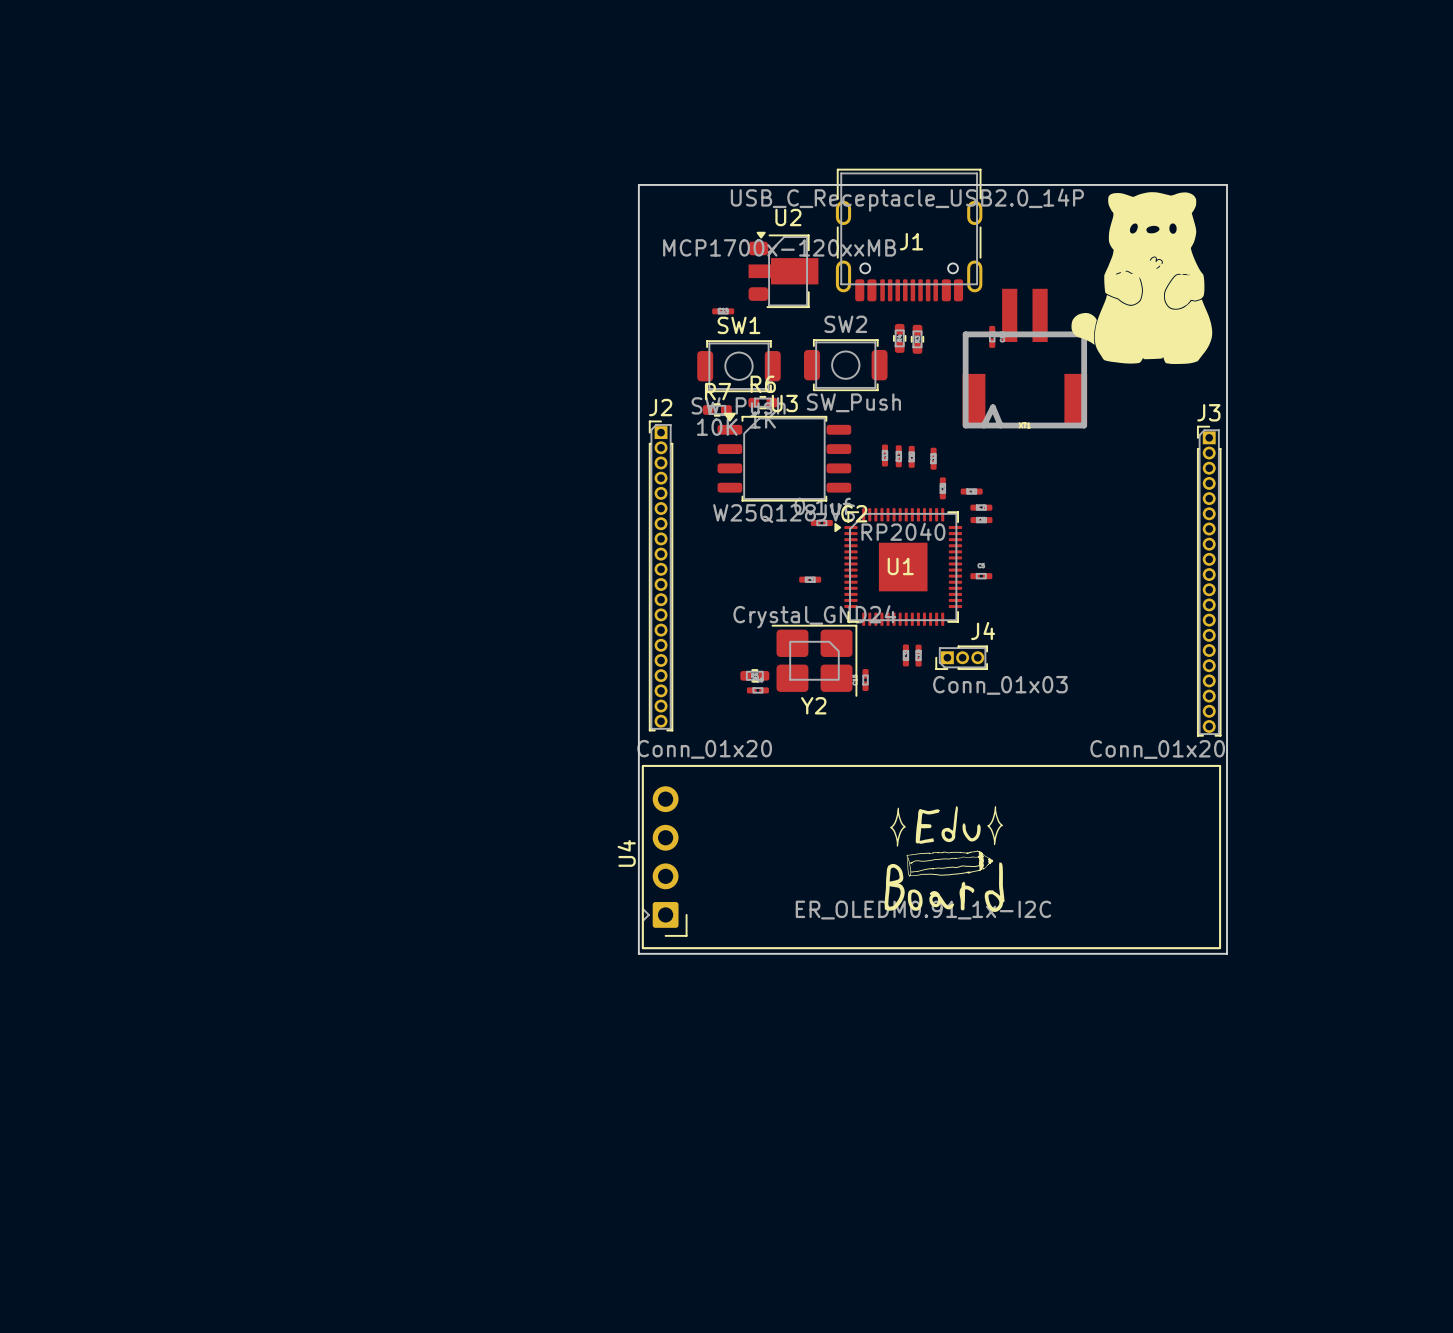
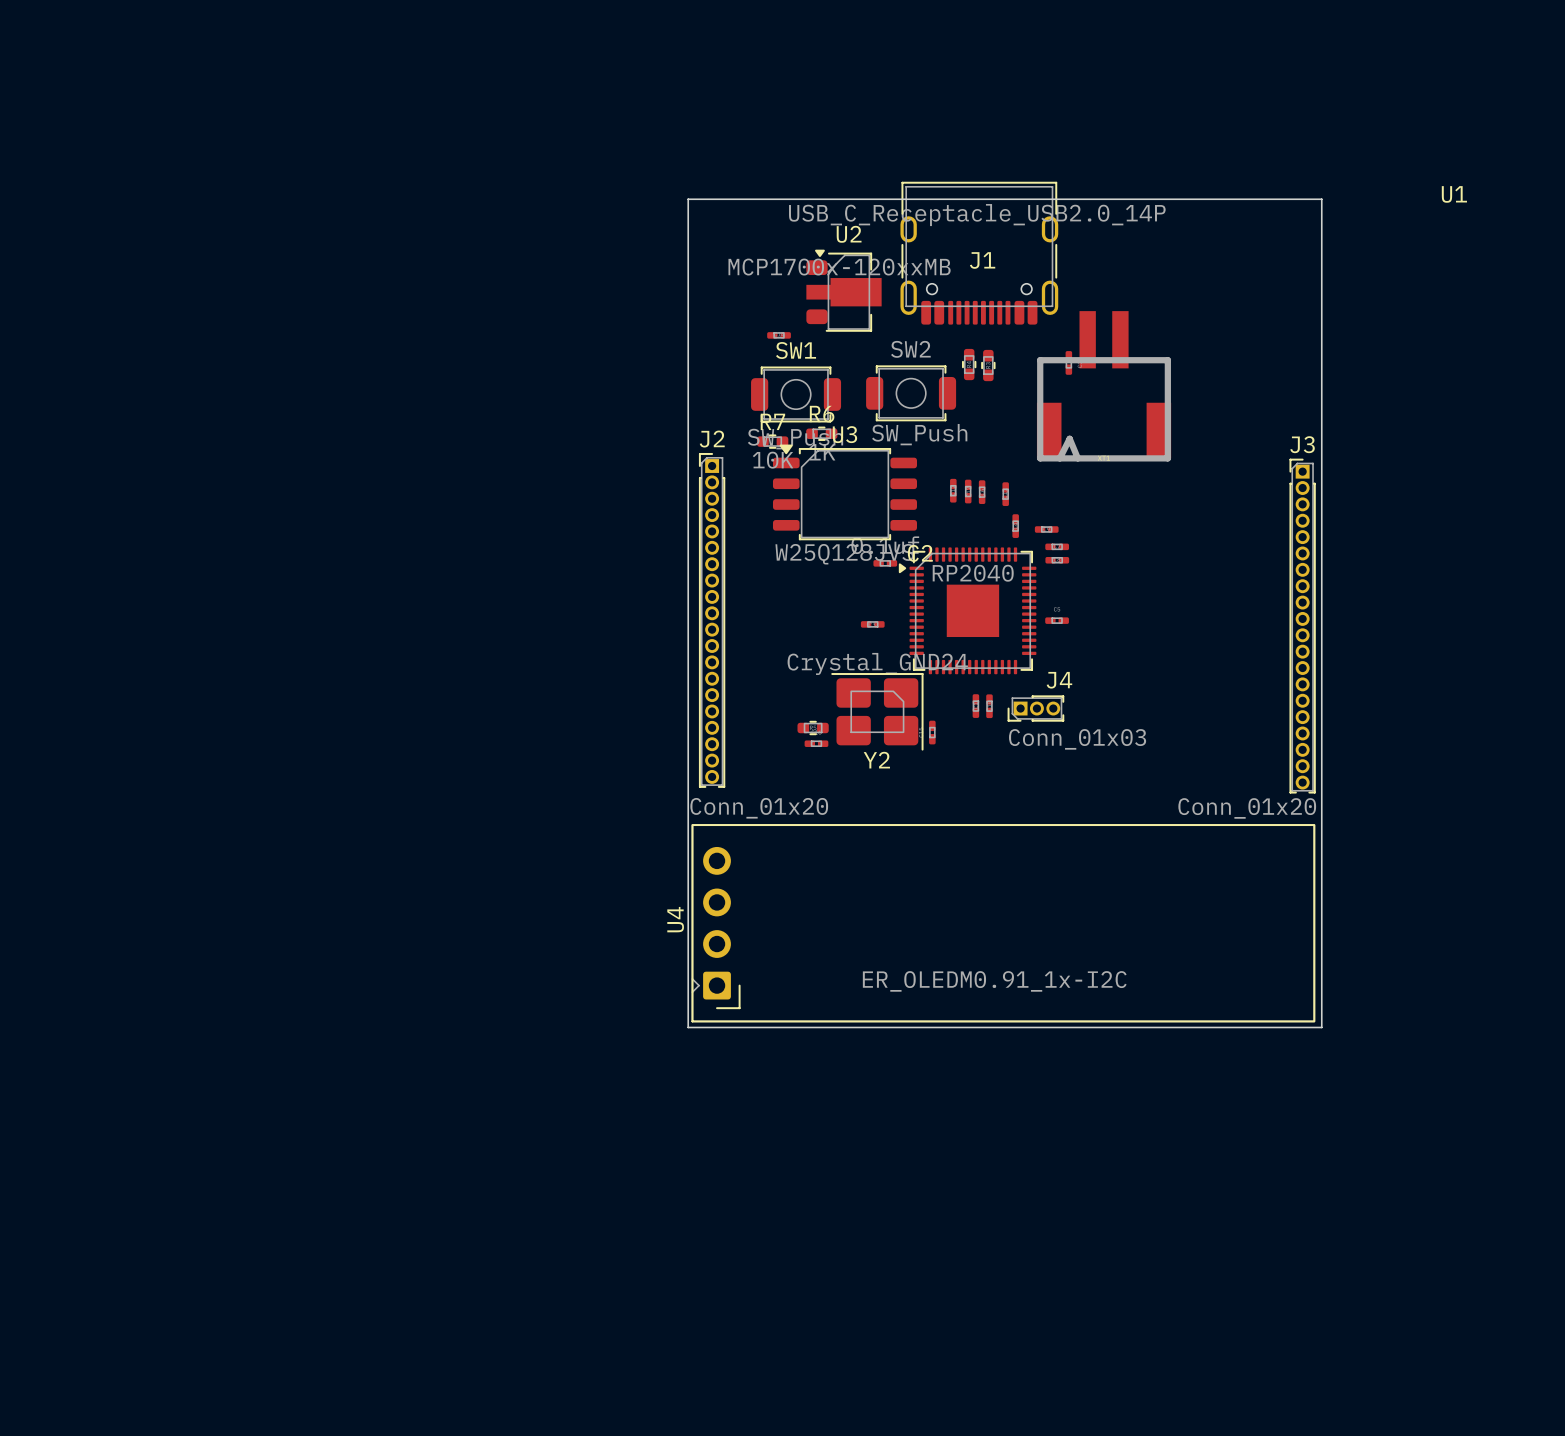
part: (1141, 278) -> none
U1 name position: U1 (900, 566) -> U1 (1454, 194)
drawing: [884, 806, 1005, 912] -> none

